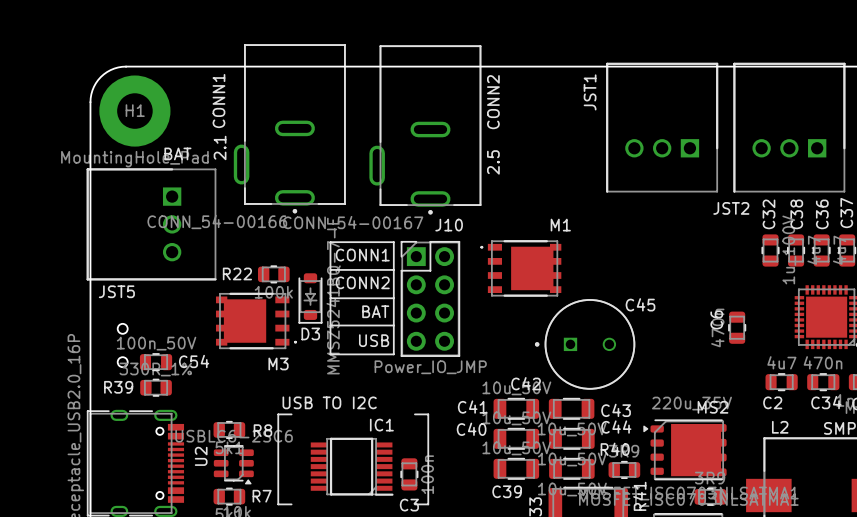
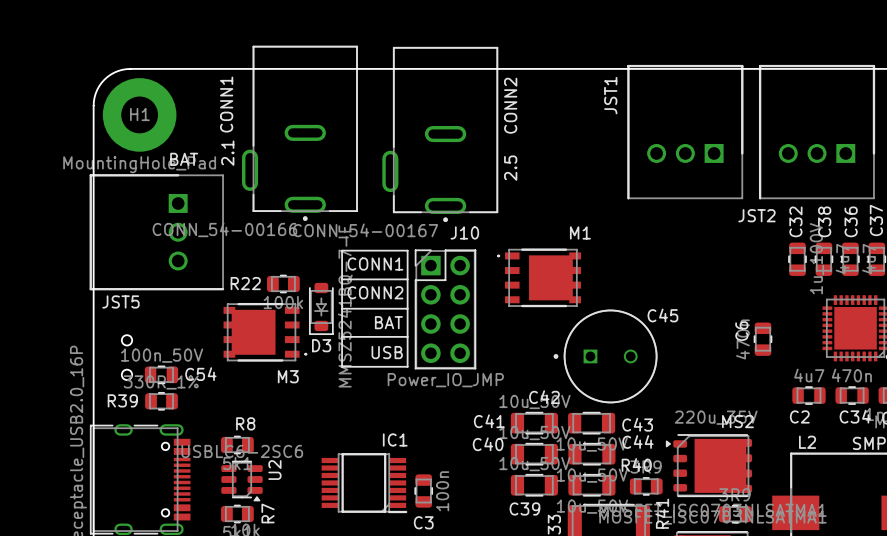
text: USB TO I2C (329, 402) -> none
line: (291, 414) (278, 414) (278, 504) (291, 504) -> none
line: (414, 414) (428, 414) (428, 504) (414, 504) -> none
R8 name position: R8 (262, 430) -> R8 (245, 423)
U2 name position: U2 (201, 456) -> U2 (274, 470)
R7 name rotation: 0° (262, 496) -> 90° counterclockwise (268, 513)

